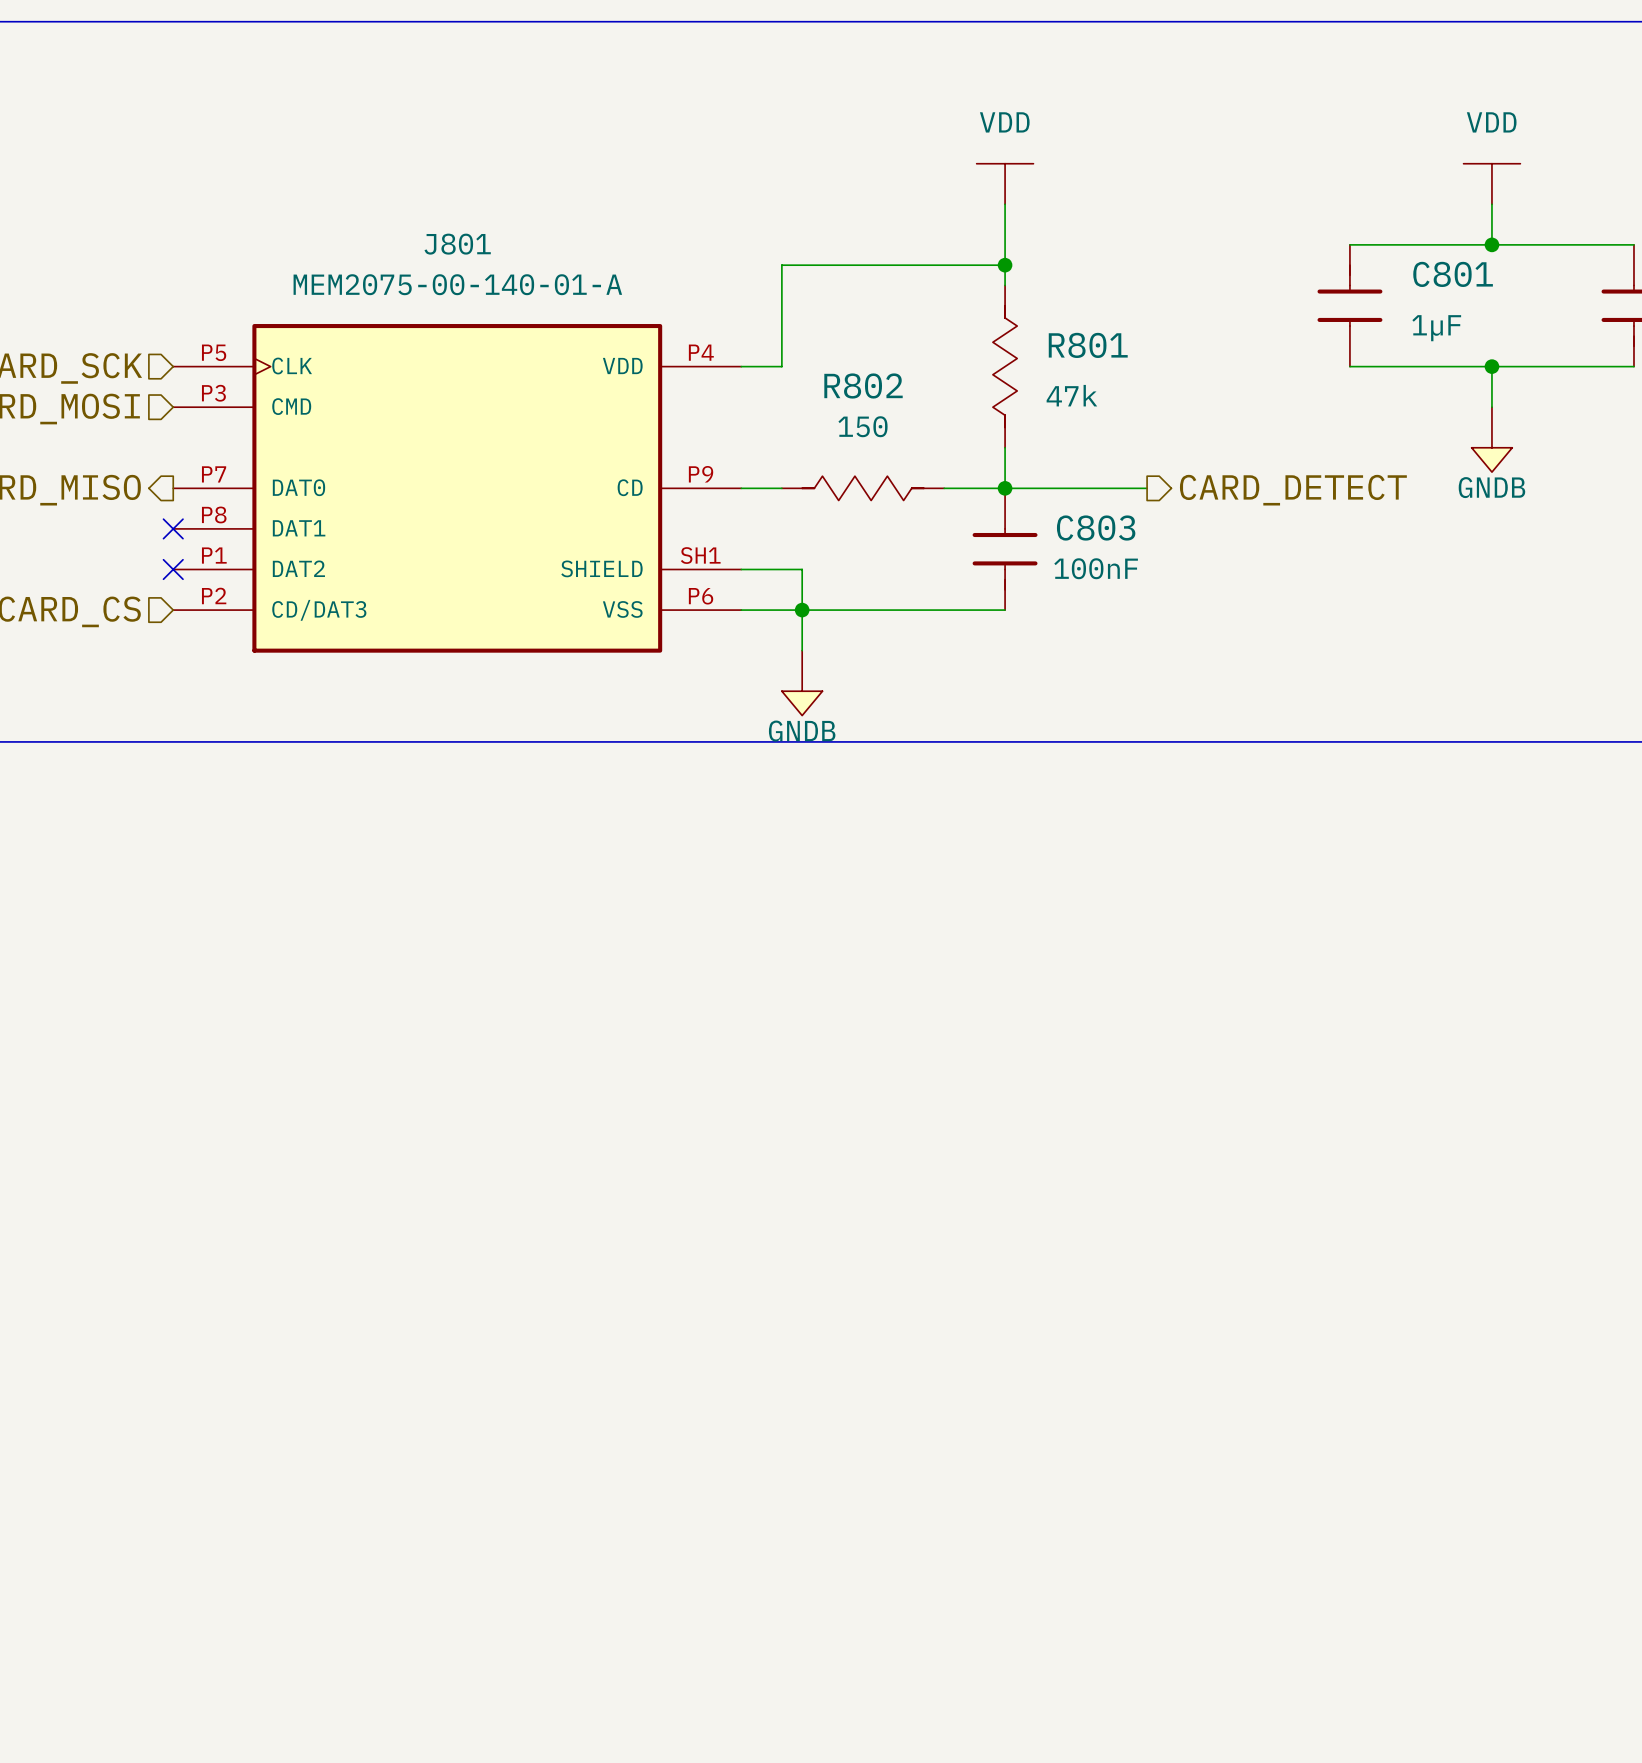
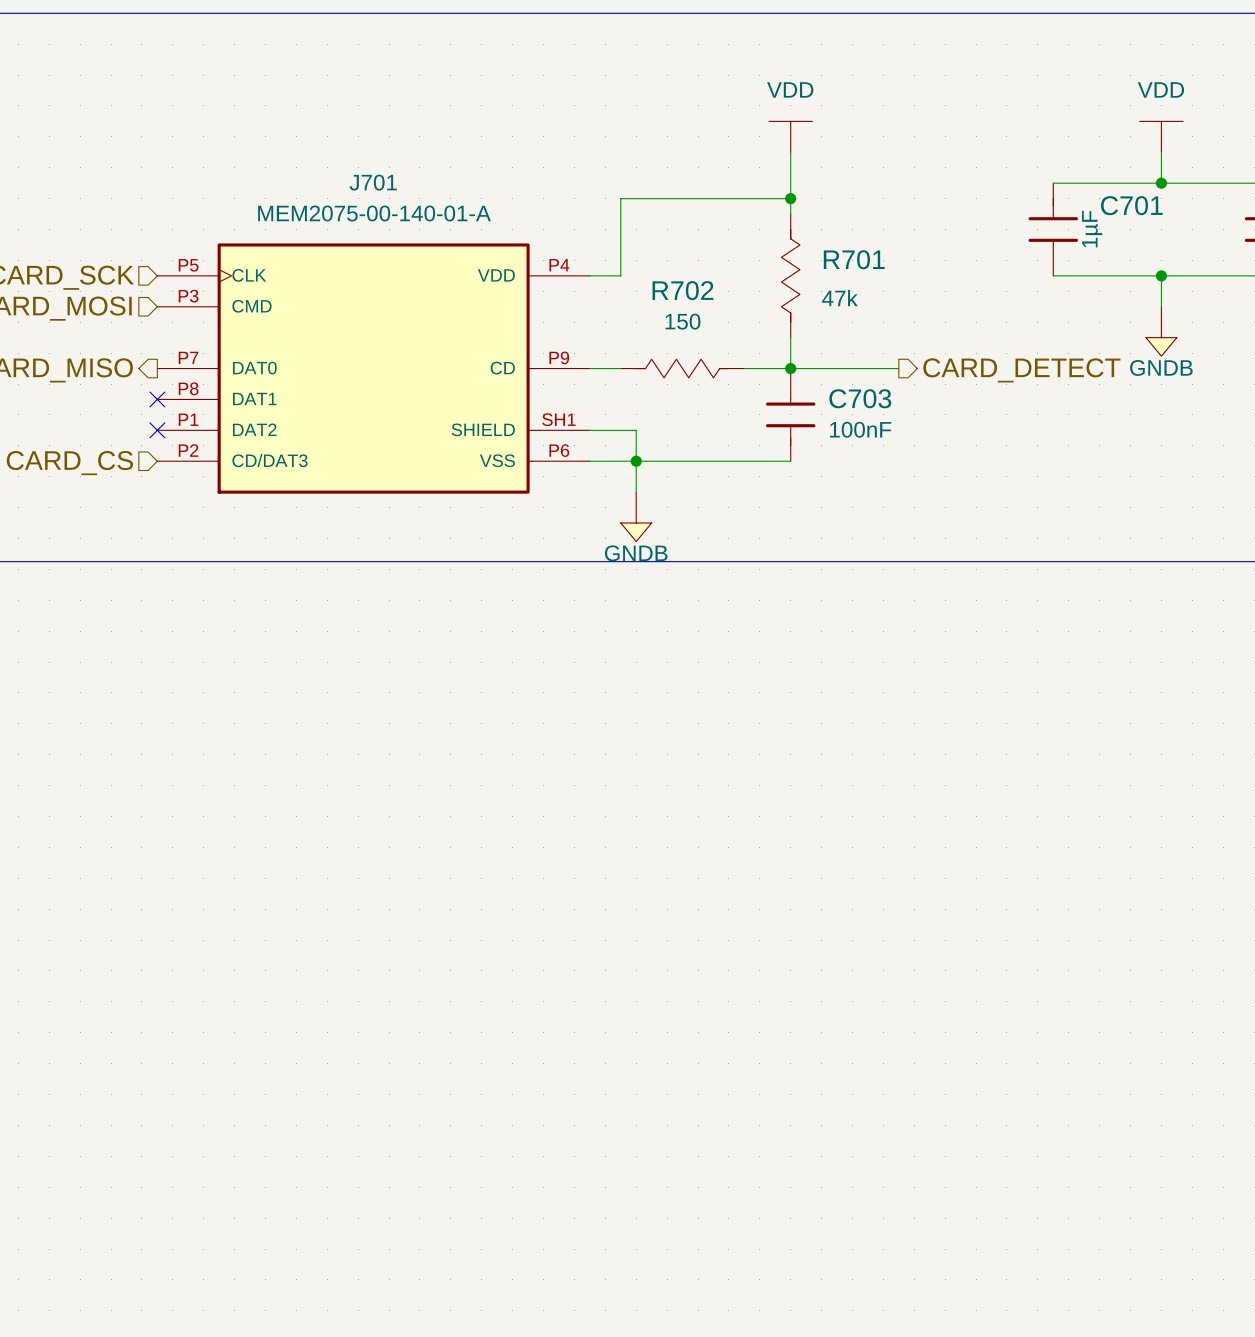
J801 name: J801 (457, 244) -> J701 (373, 182)
C801 name: C801 (1453, 274) -> C701 (1131, 205)
C801 text rotation: 0° (1436, 328) -> 90° counterclockwise (1092, 229)
R801 name: R801 (1088, 345) -> R701 (854, 259)
R802 name: R802 (863, 385) -> R702 (682, 290)
C803 name: C803 (1096, 528) -> C703 (860, 398)

